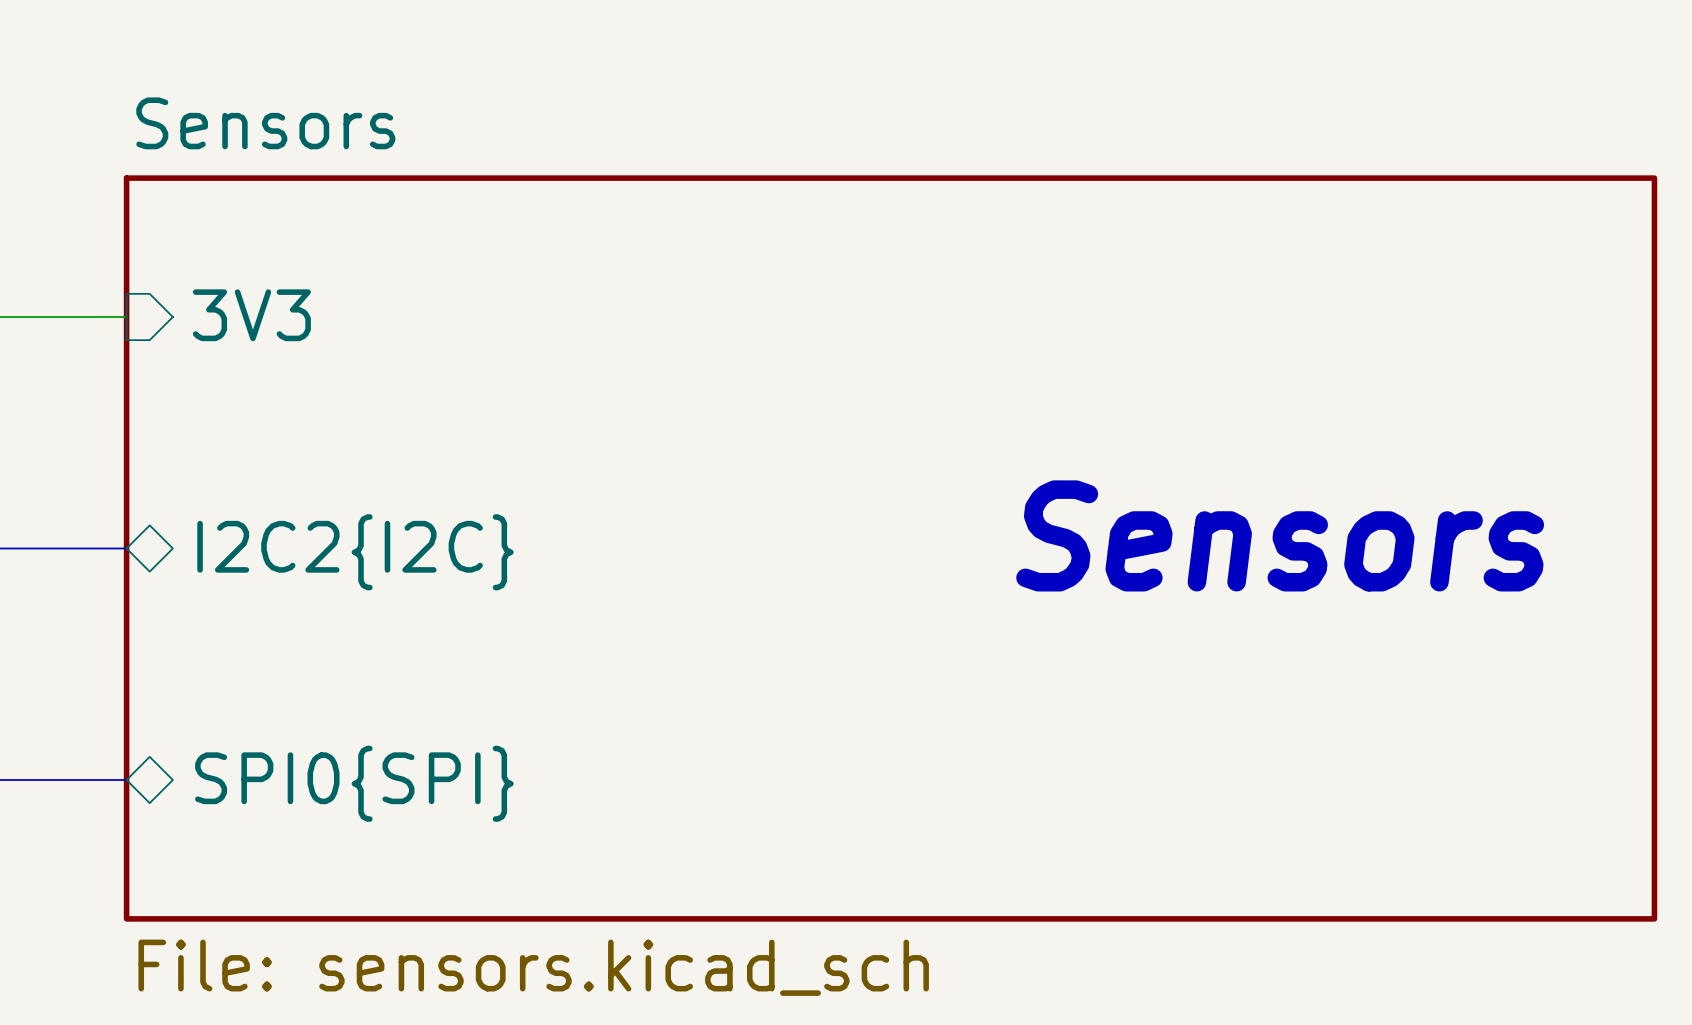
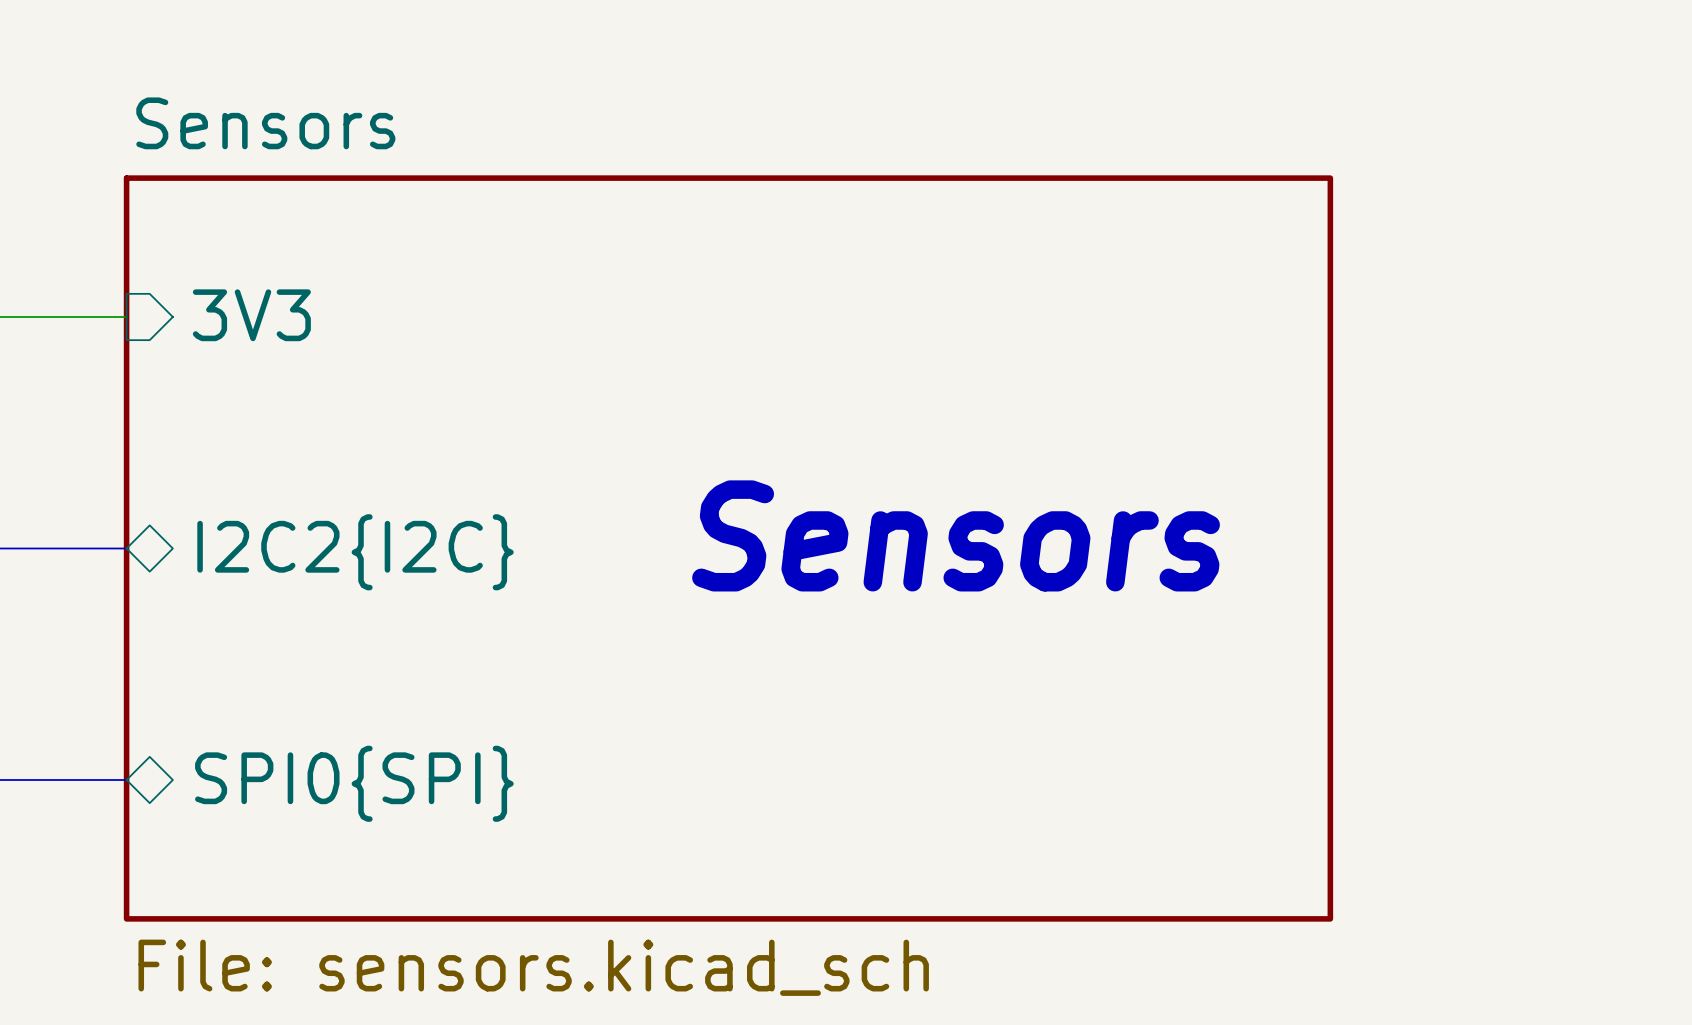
text position: Sensors (1280, 535) -> Sensors (956, 535)
sheet Sensors: none -> File: sensors.kicad_sch (728, 548)
sheet Sensors: File: sensors.kicad_sch (890, 548) -> none

